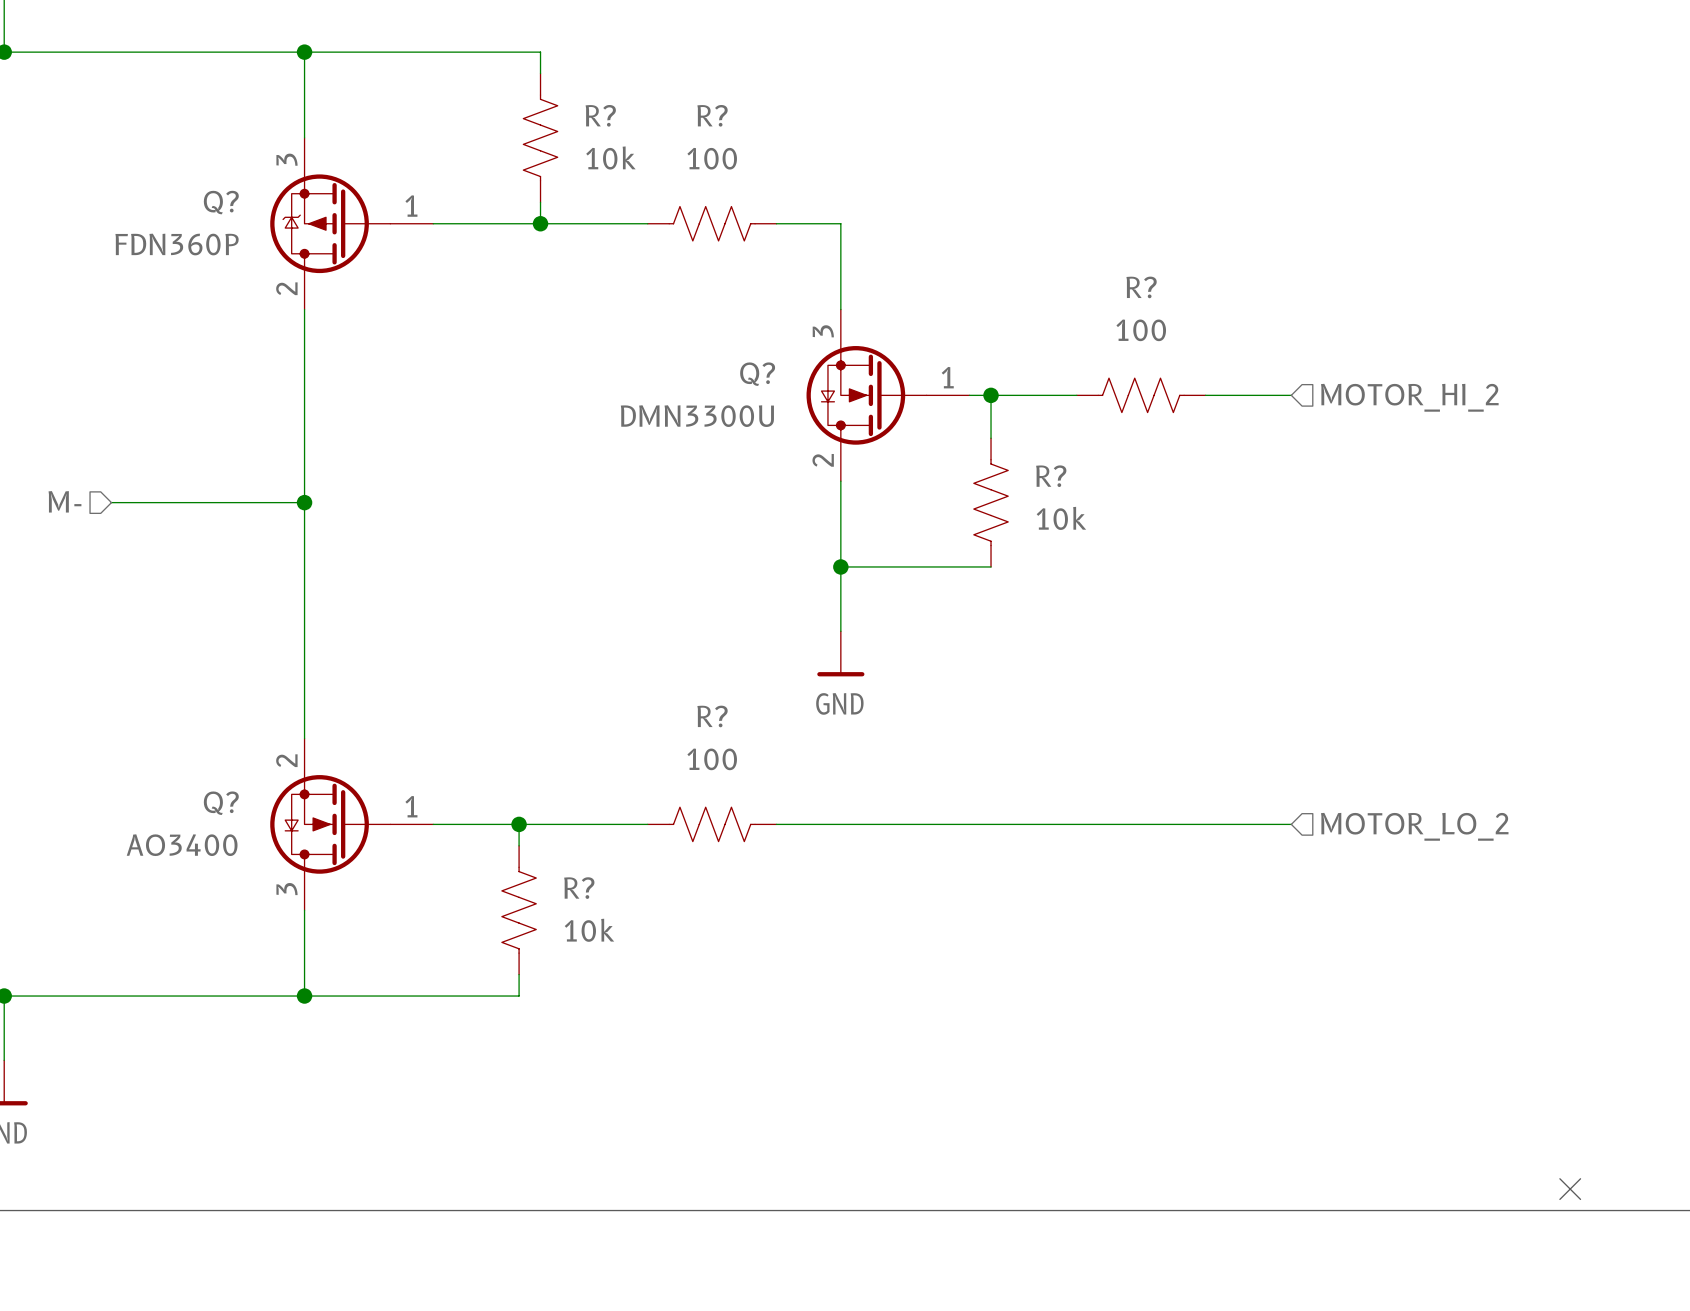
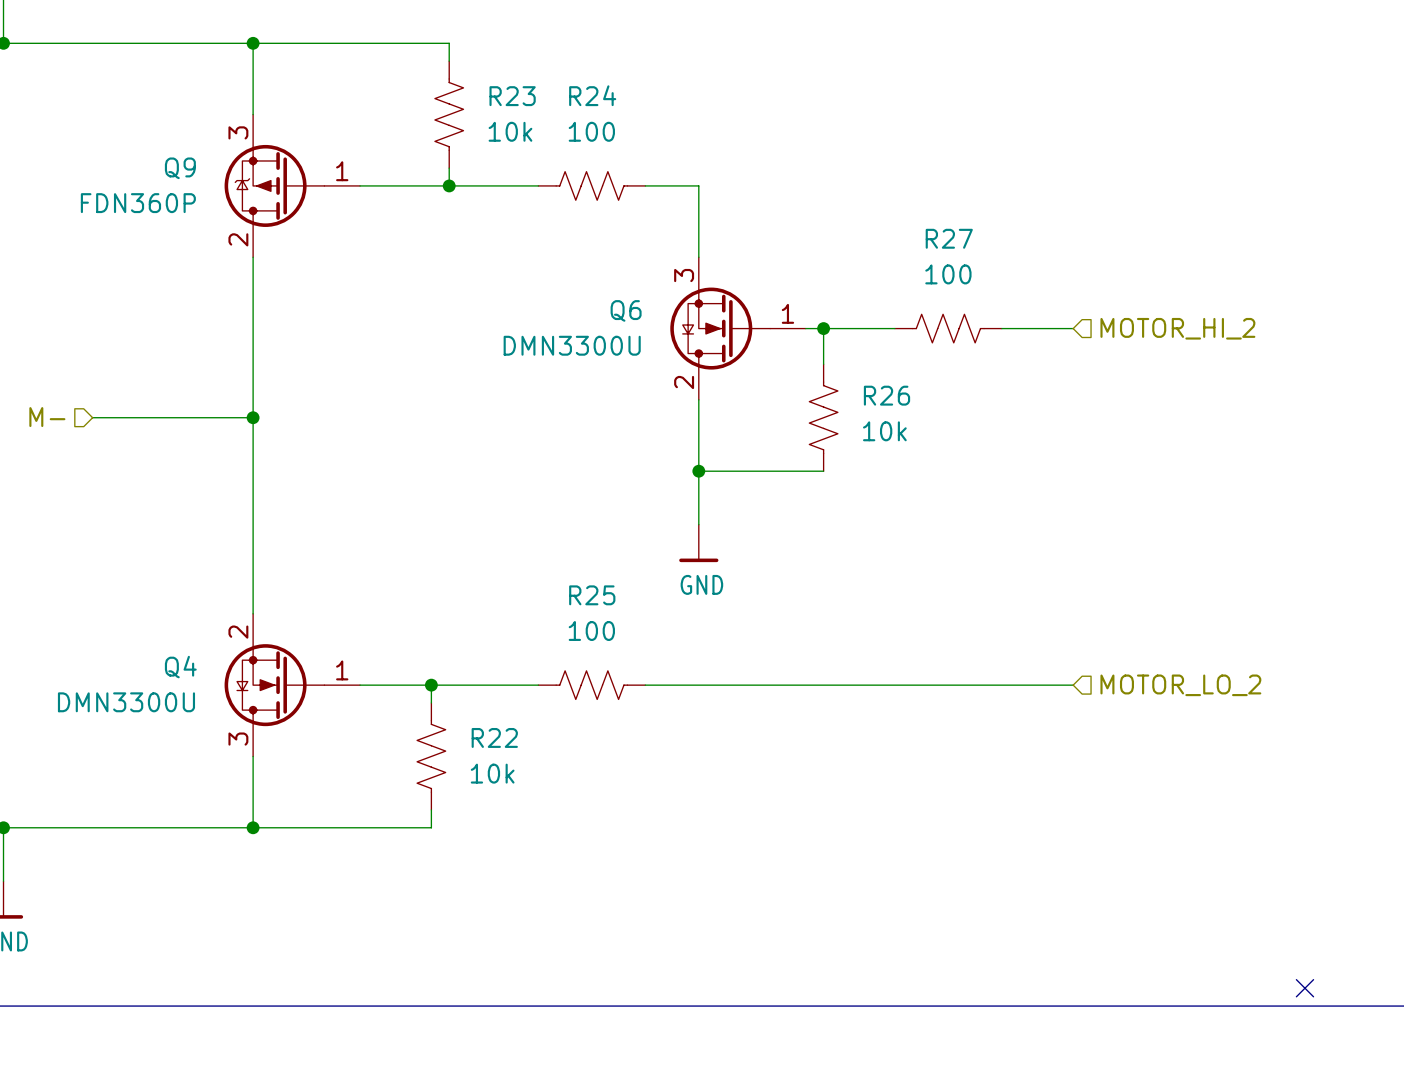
R? name: R? (600, 115) -> R23 (512, 96)
R? name: R? (712, 115) -> R24 (592, 95)
Q? name: Q? (221, 202) -> Q9 (180, 168)
R? name: R? (1141, 287) -> R27 (949, 238)
Q? name: Q? (757, 374) -> Q6 (626, 310)
R? name: R? (1051, 476) -> R26 (886, 395)
R? name: R? (712, 716) -> R25 (592, 595)
Q? name: Q? (221, 803) -> Q4 (180, 667)
Q? value: AO3400 (182, 845) -> DMN3300U (126, 702)
R? name: R? (579, 888) -> R22 (494, 737)

